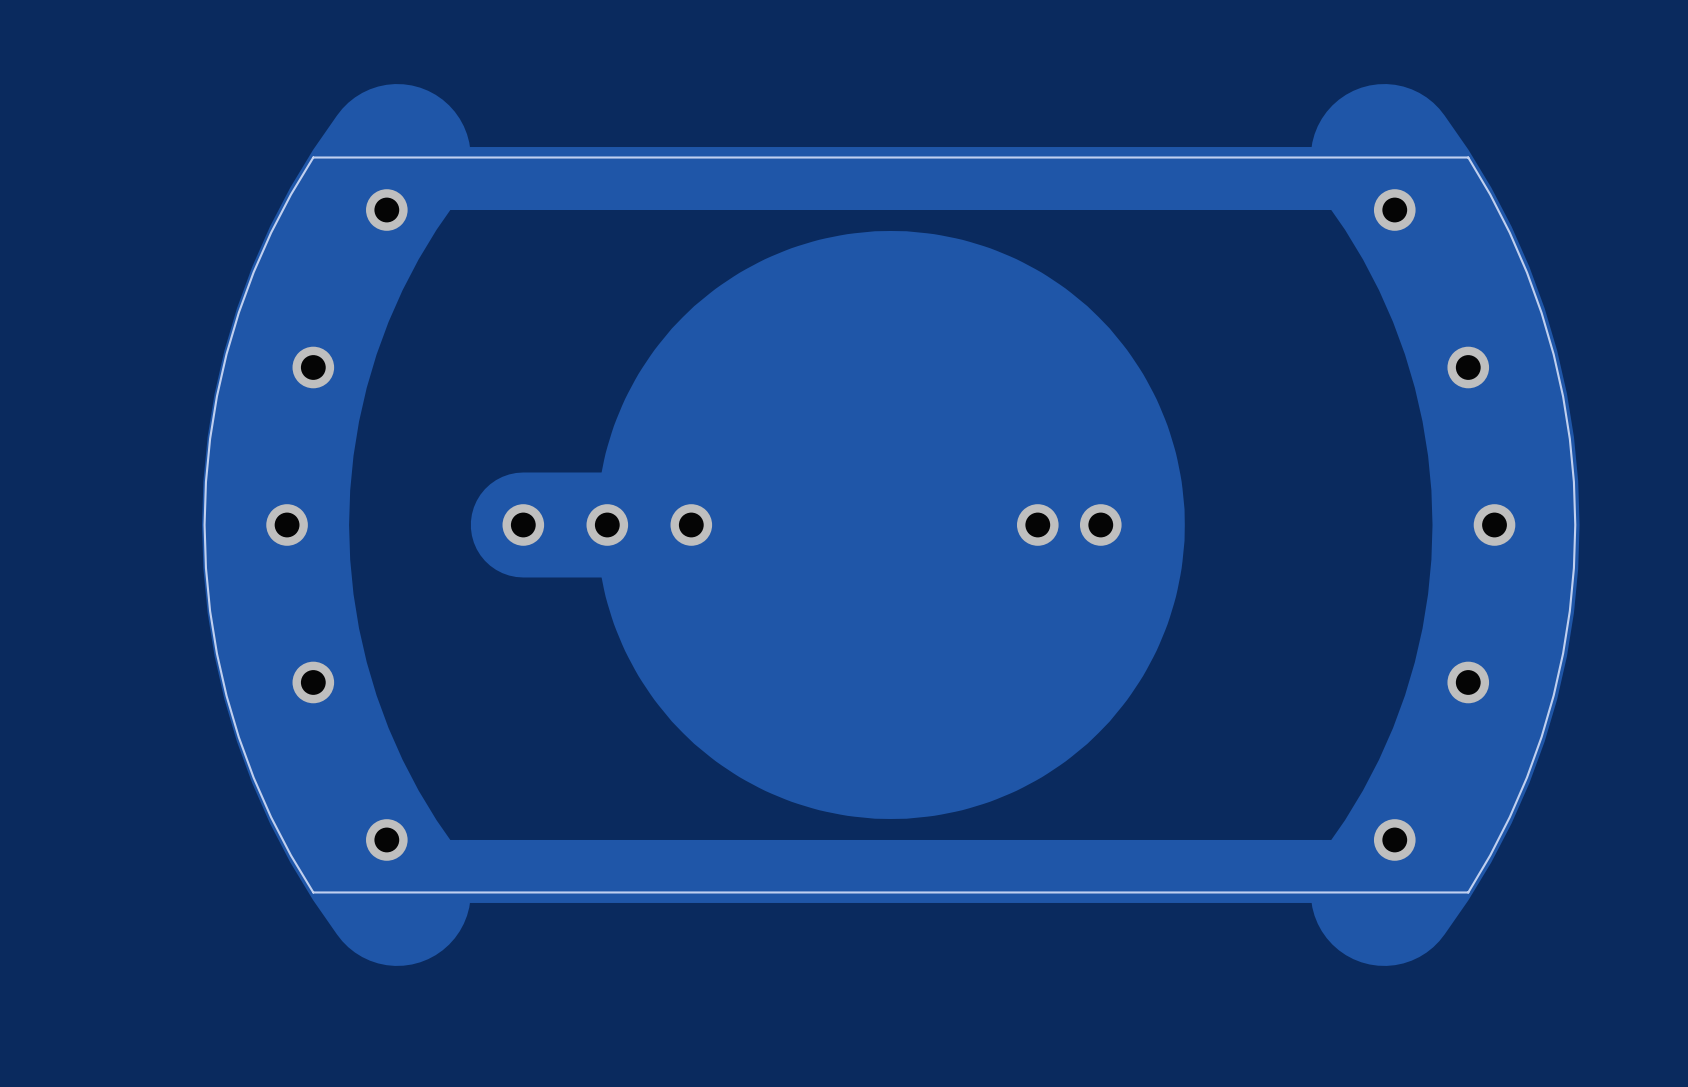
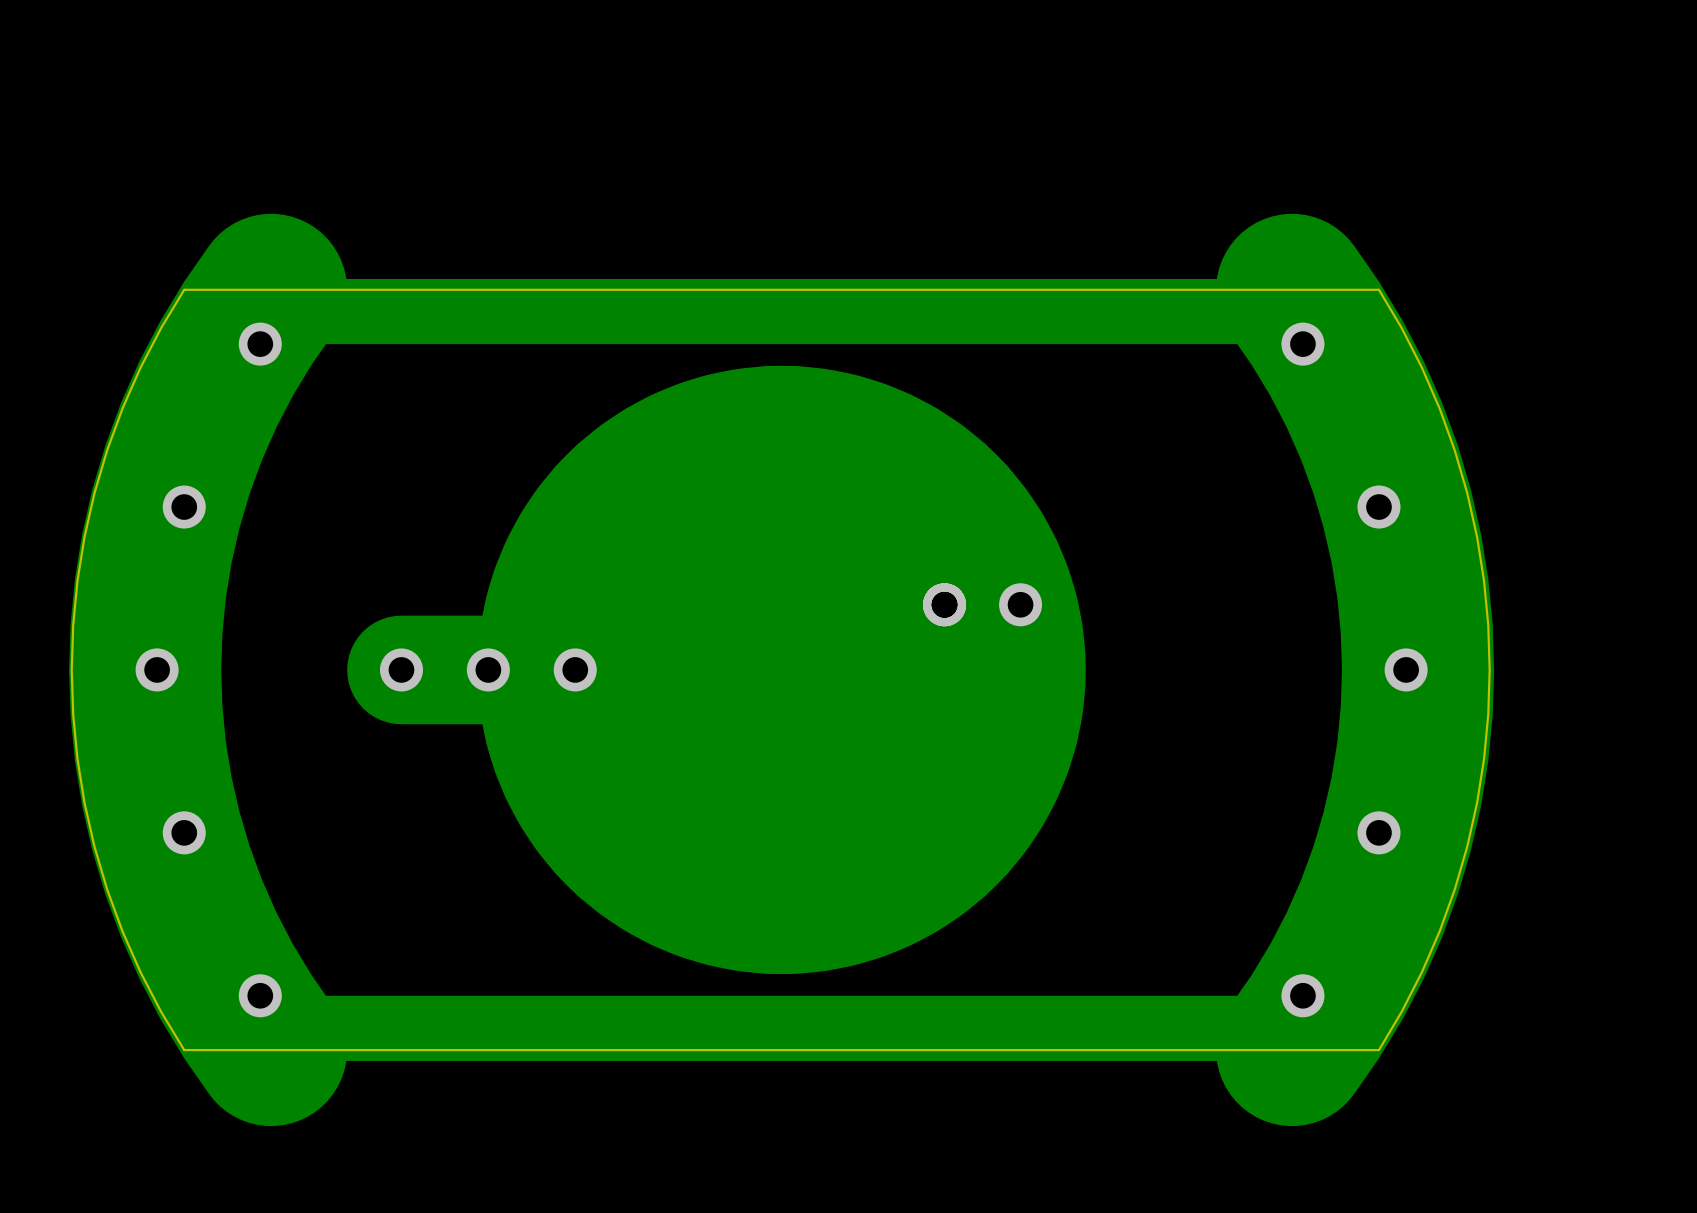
via: none -> (944, 604)
via: none -> (1020, 604)
via: (1037, 524) -> none
via: (1100, 524) -> none

